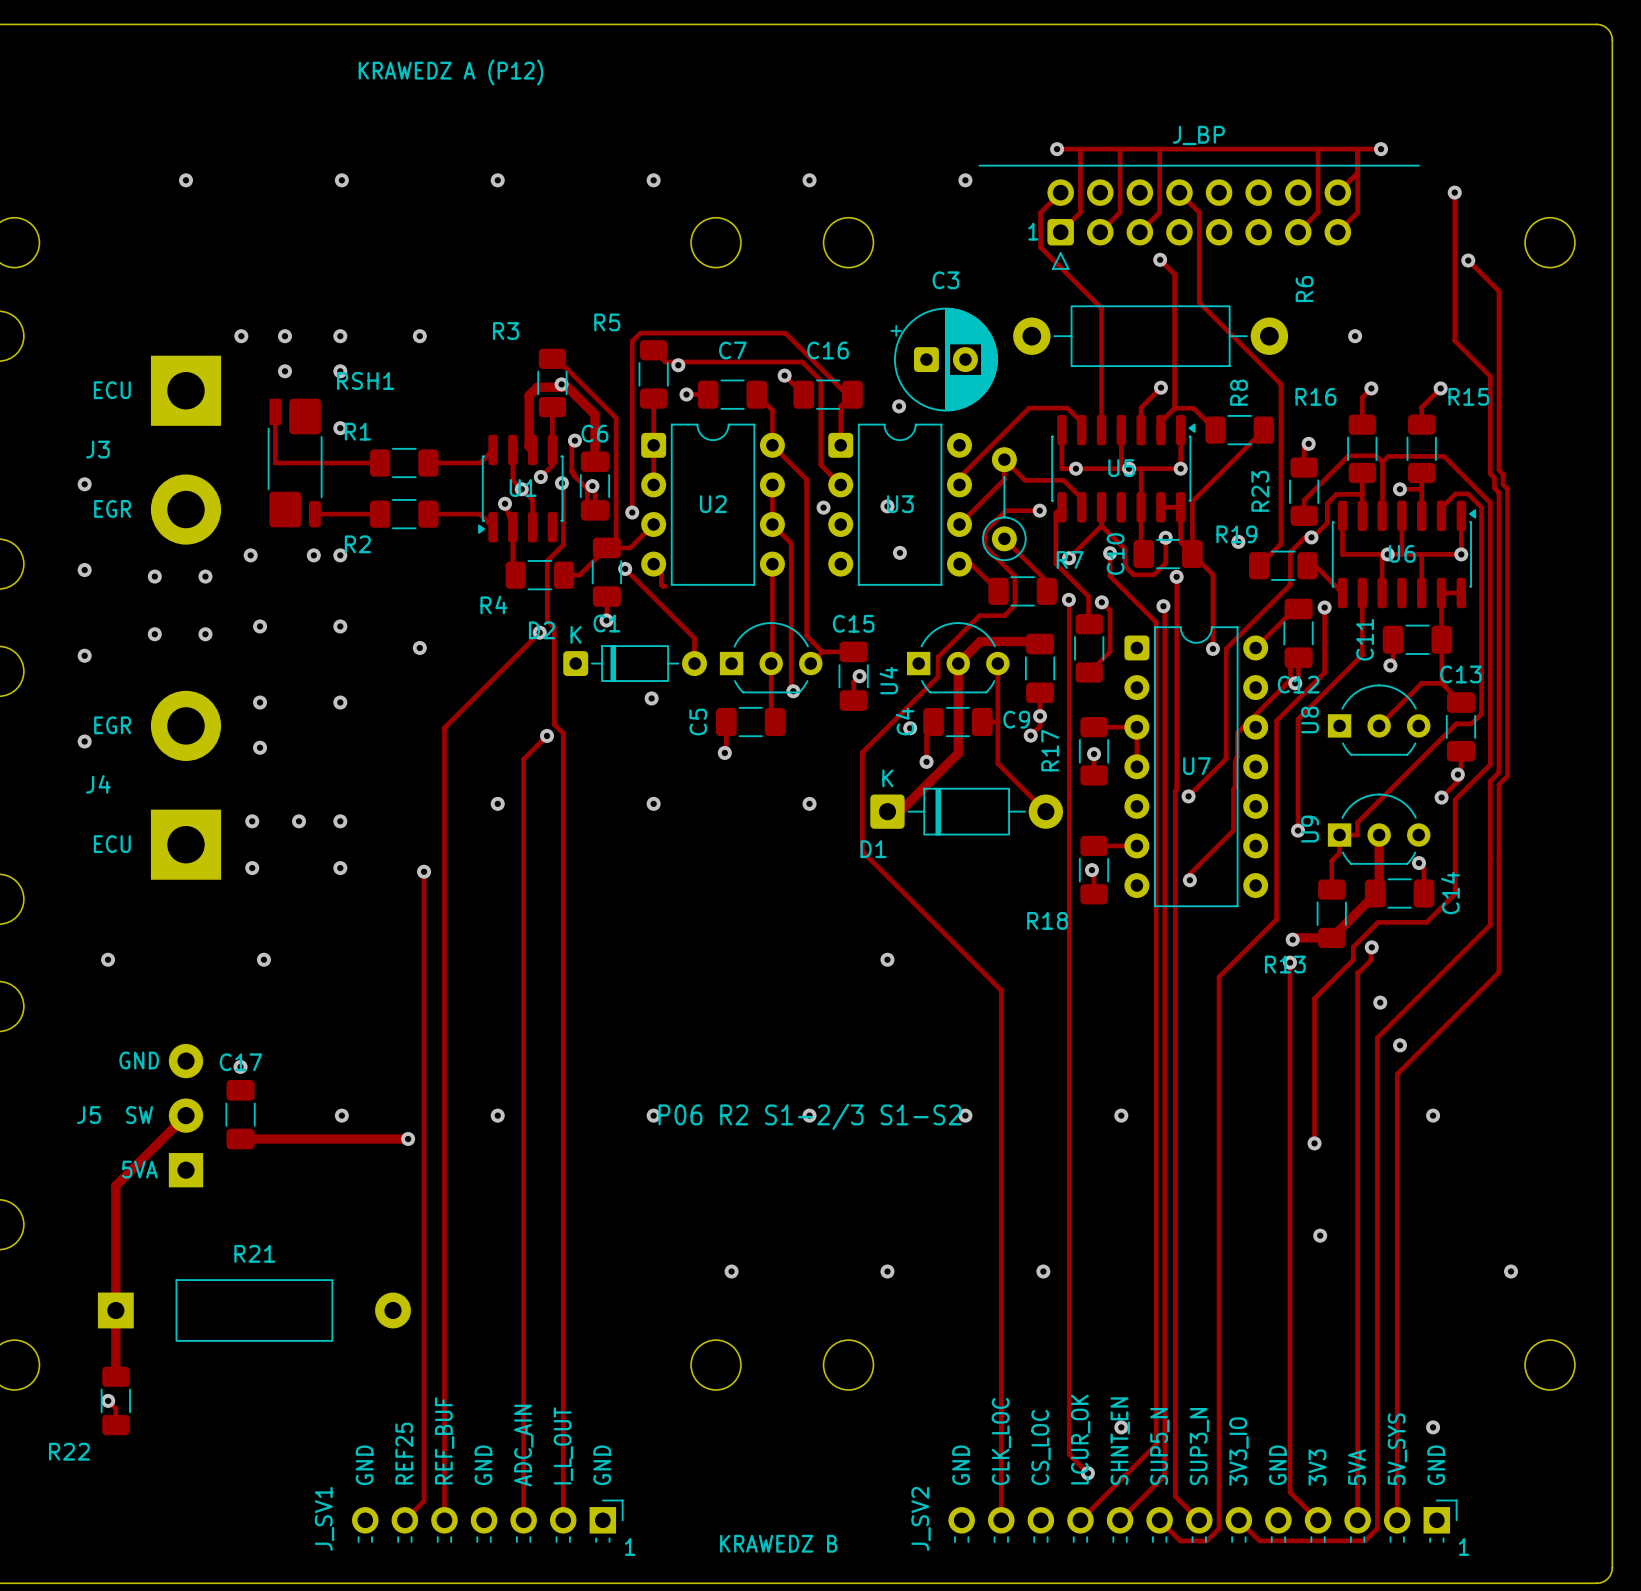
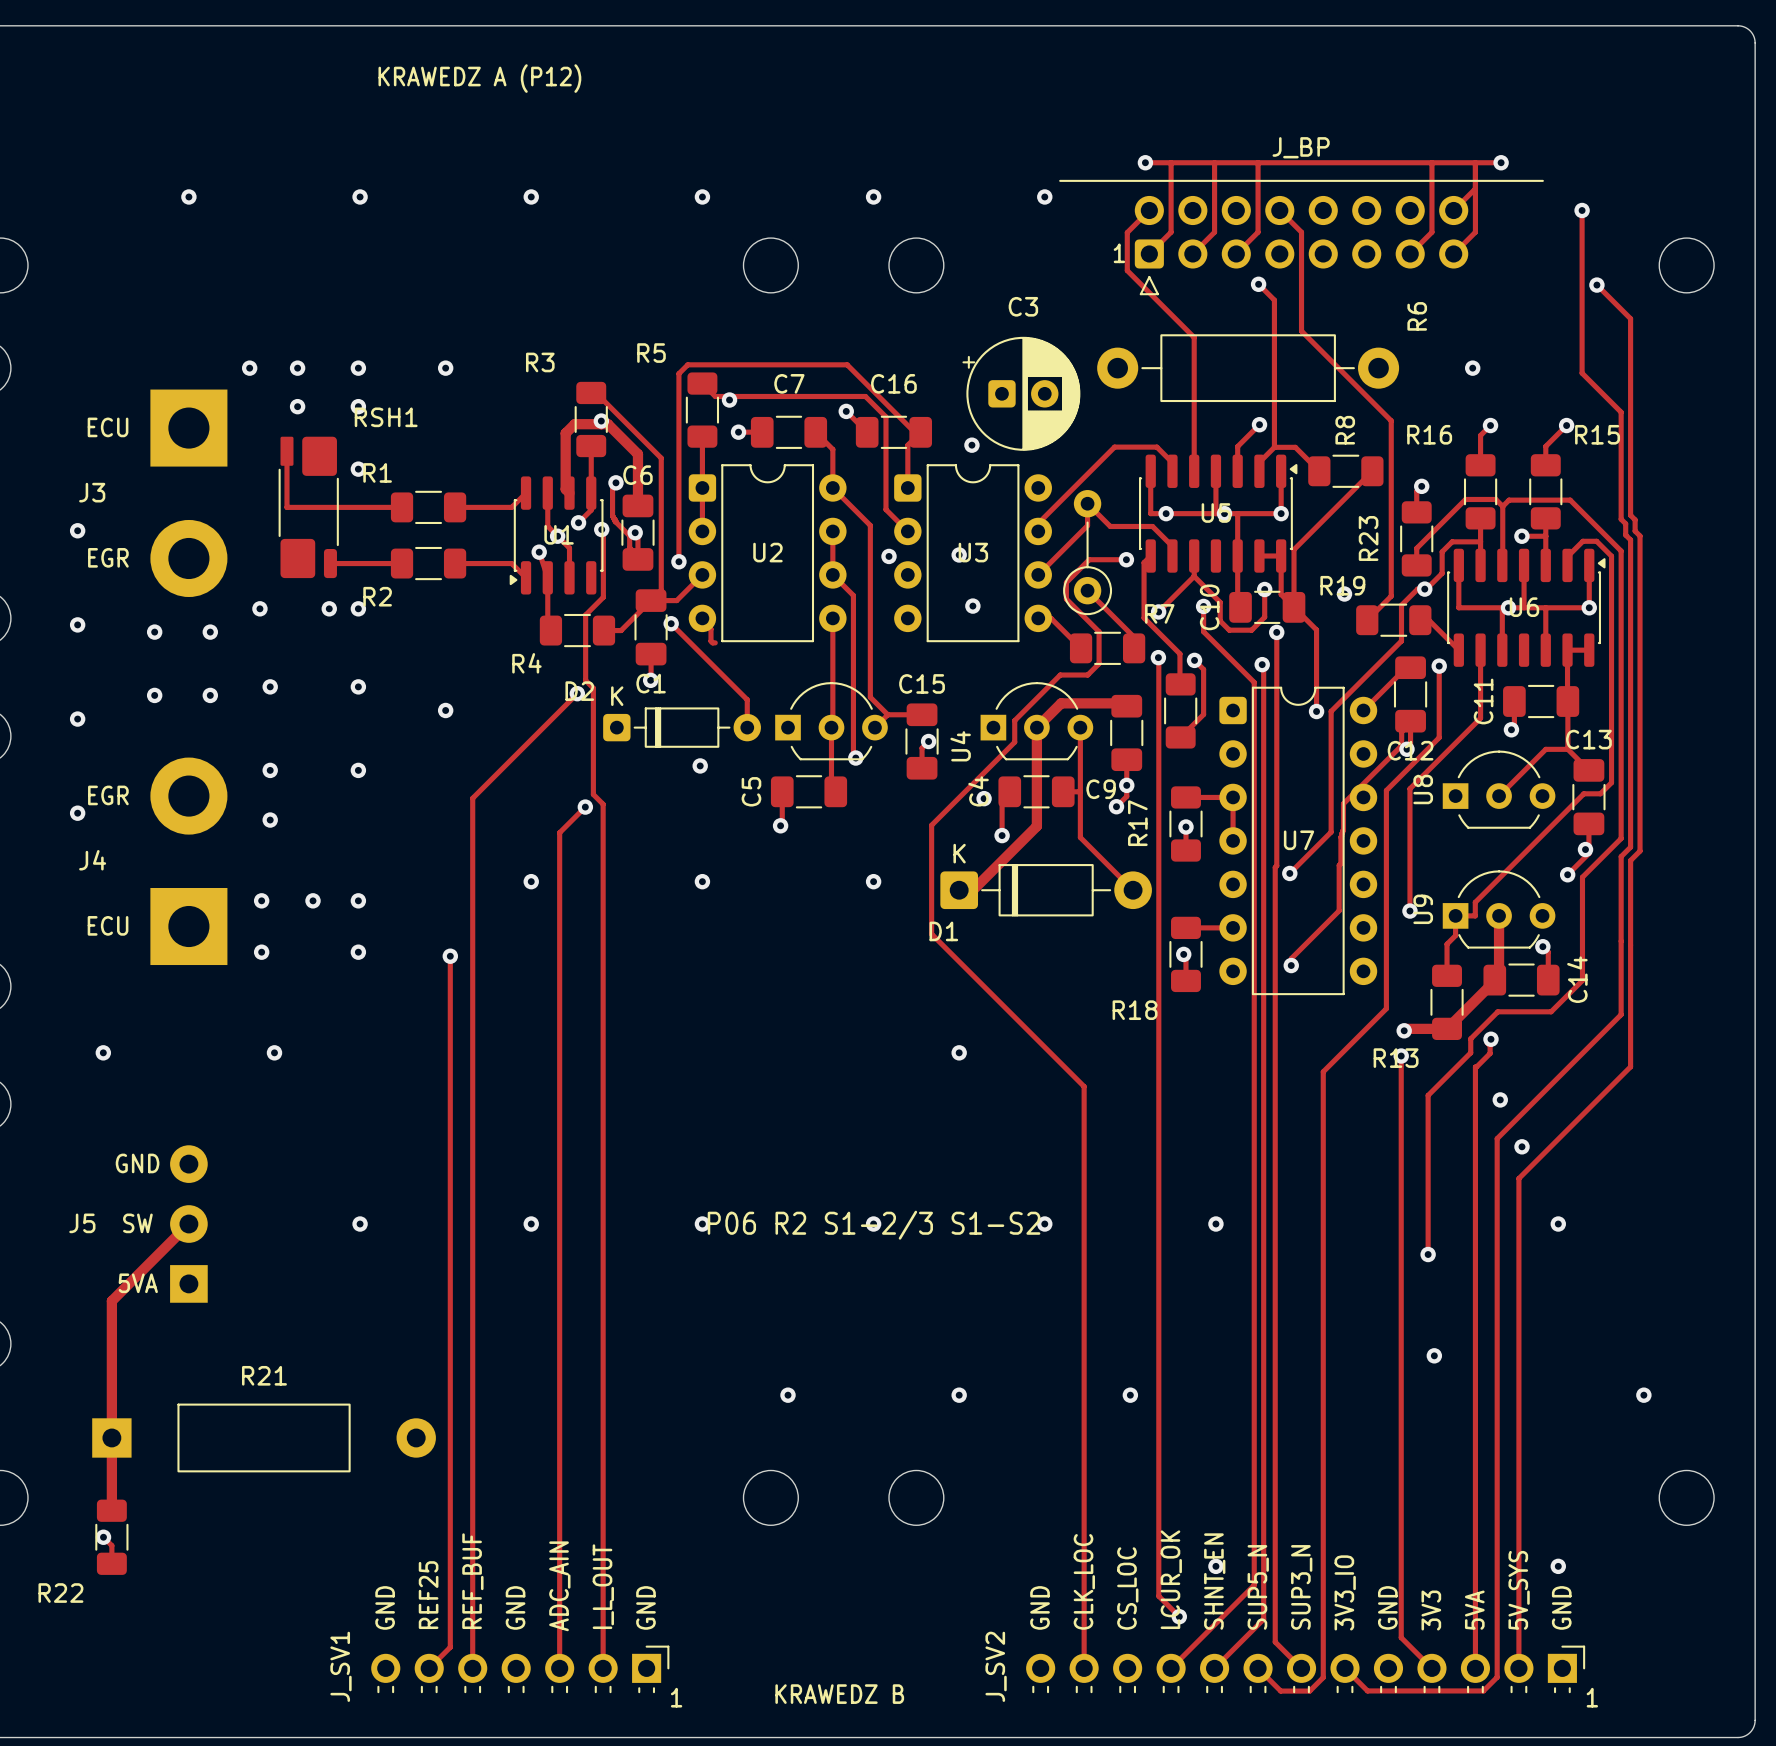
via: (240, 1066) -> none
C17: (240, 1114) -> none
track: (240, 1139) (408, 1139) -> none
via: (408, 1139) -> none

